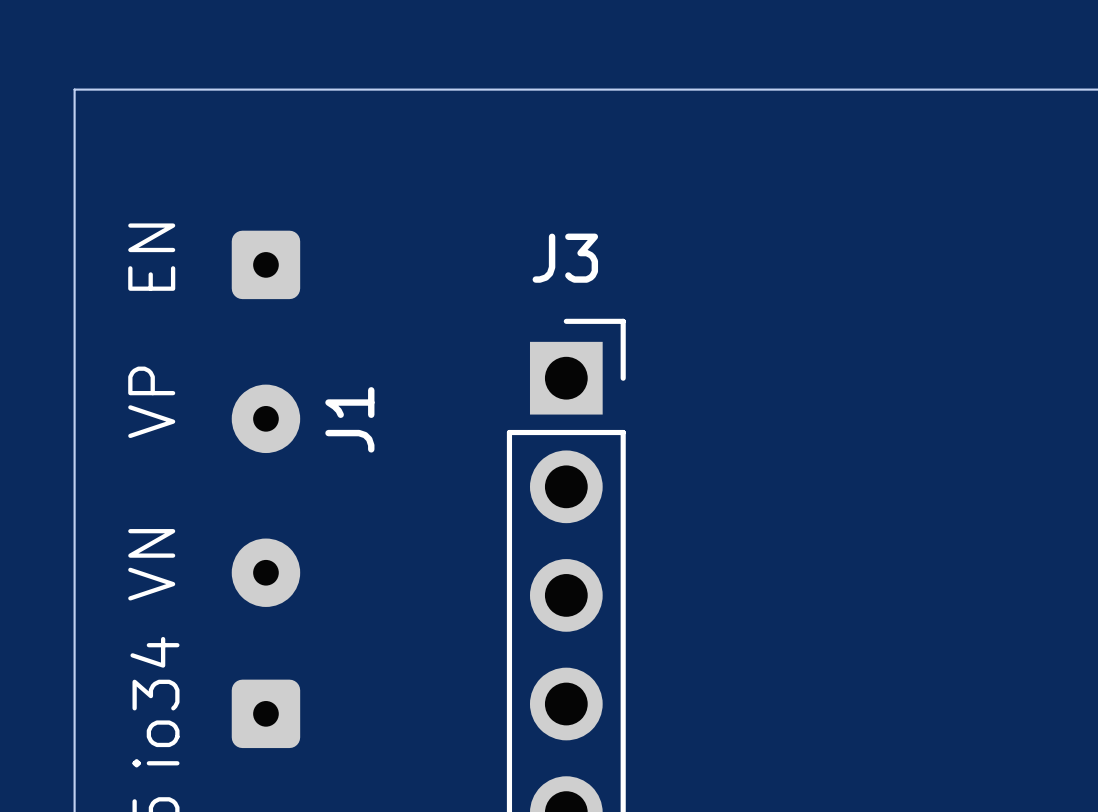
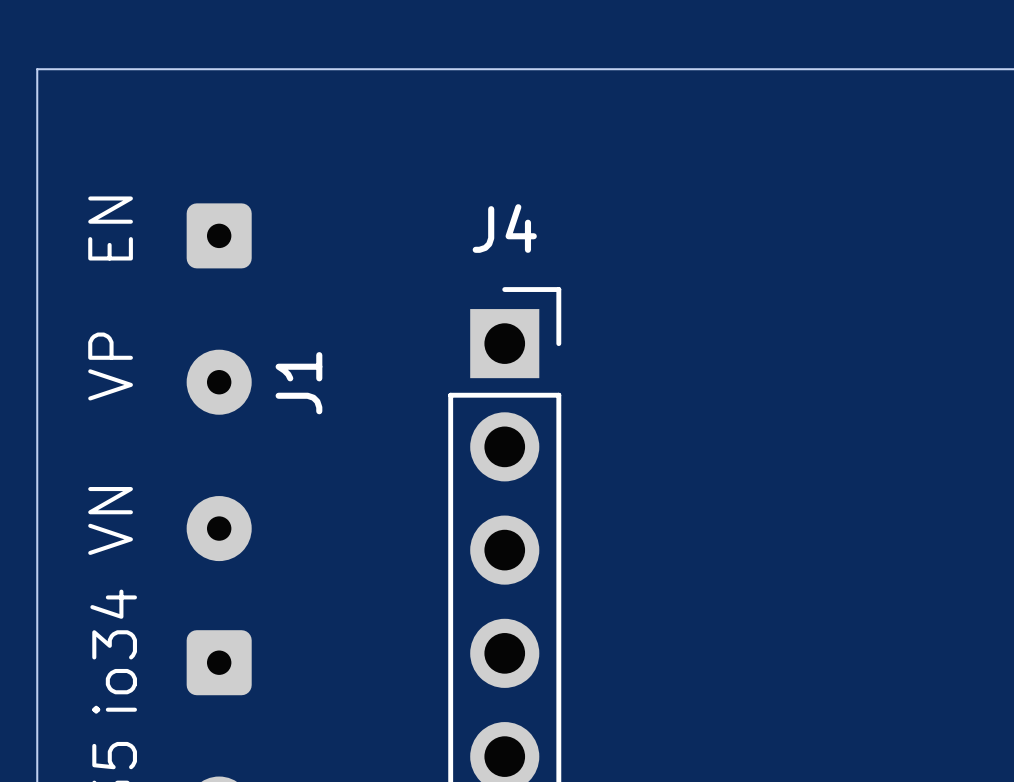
J3 name: J3 (565, 258) -> J4 (504, 228)

